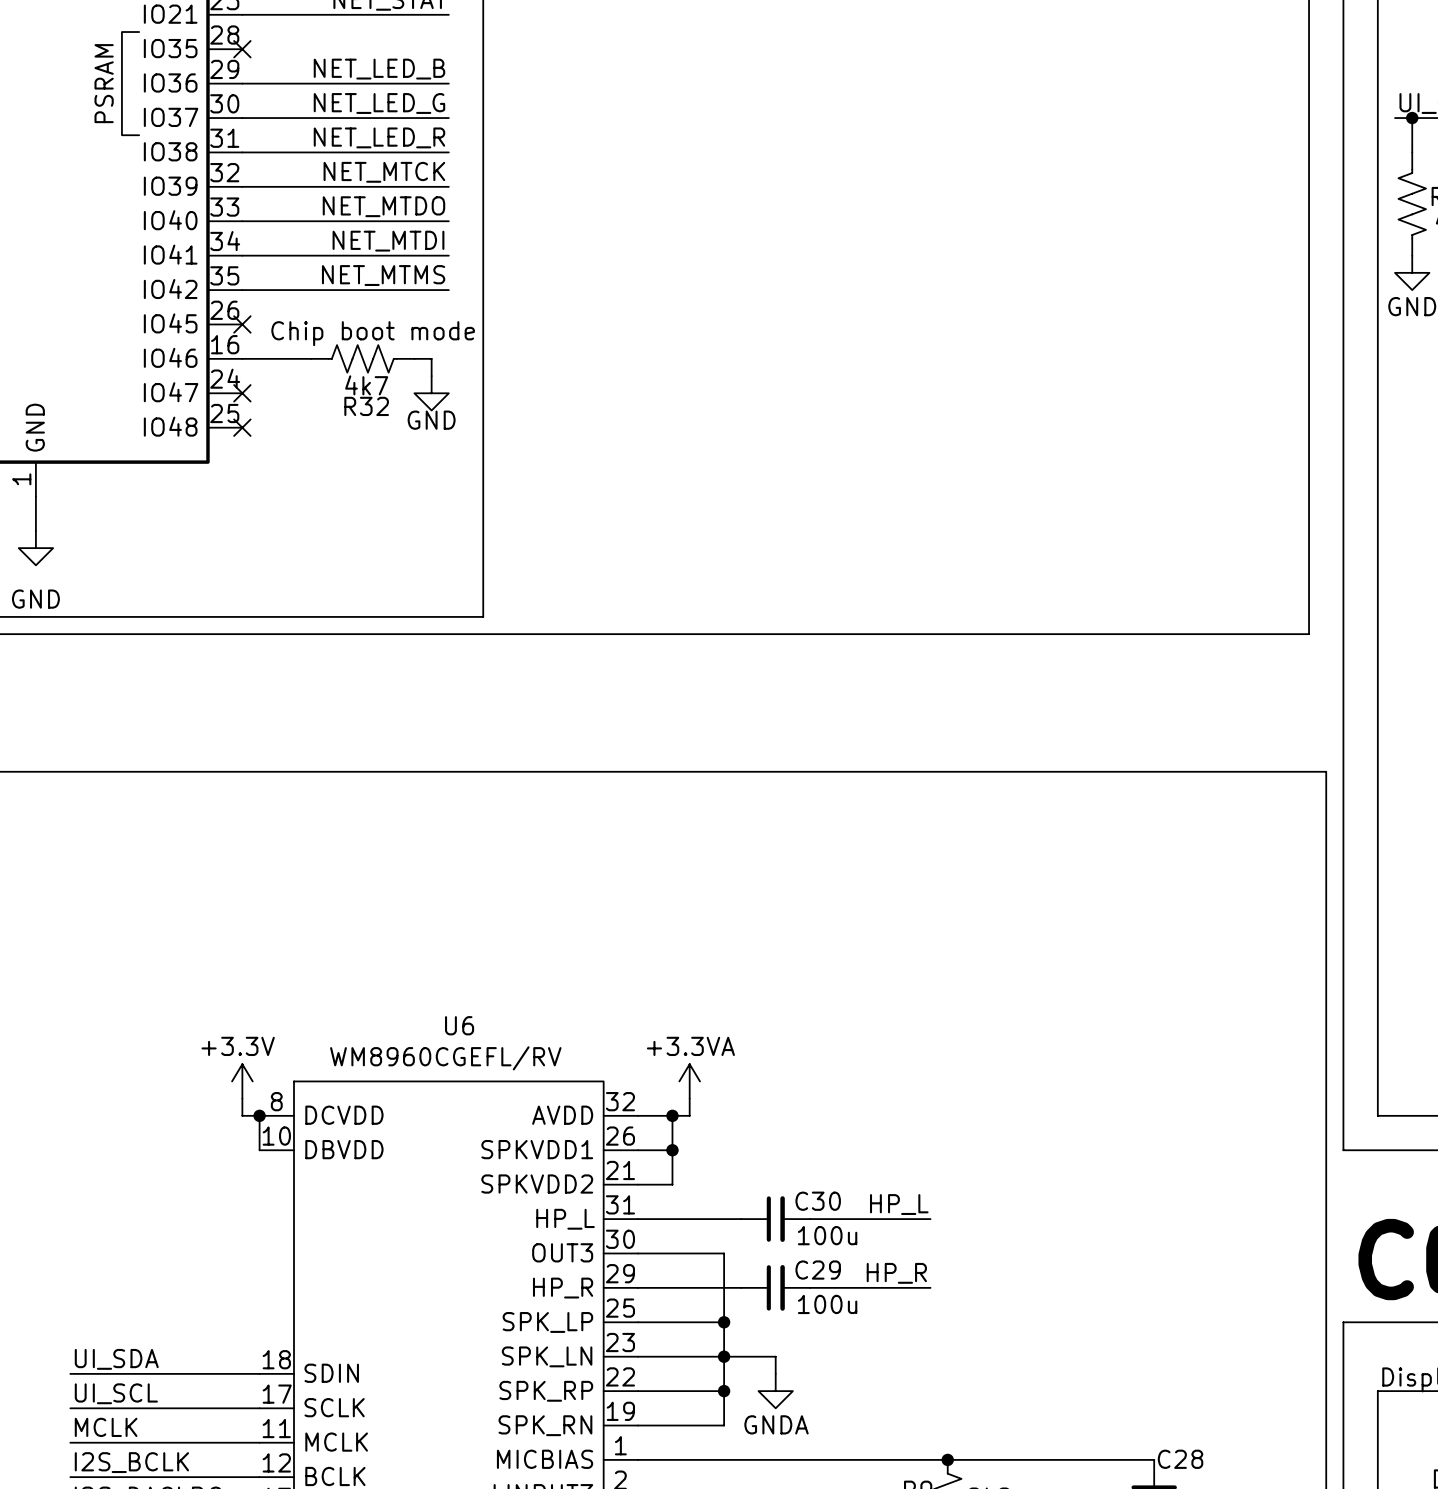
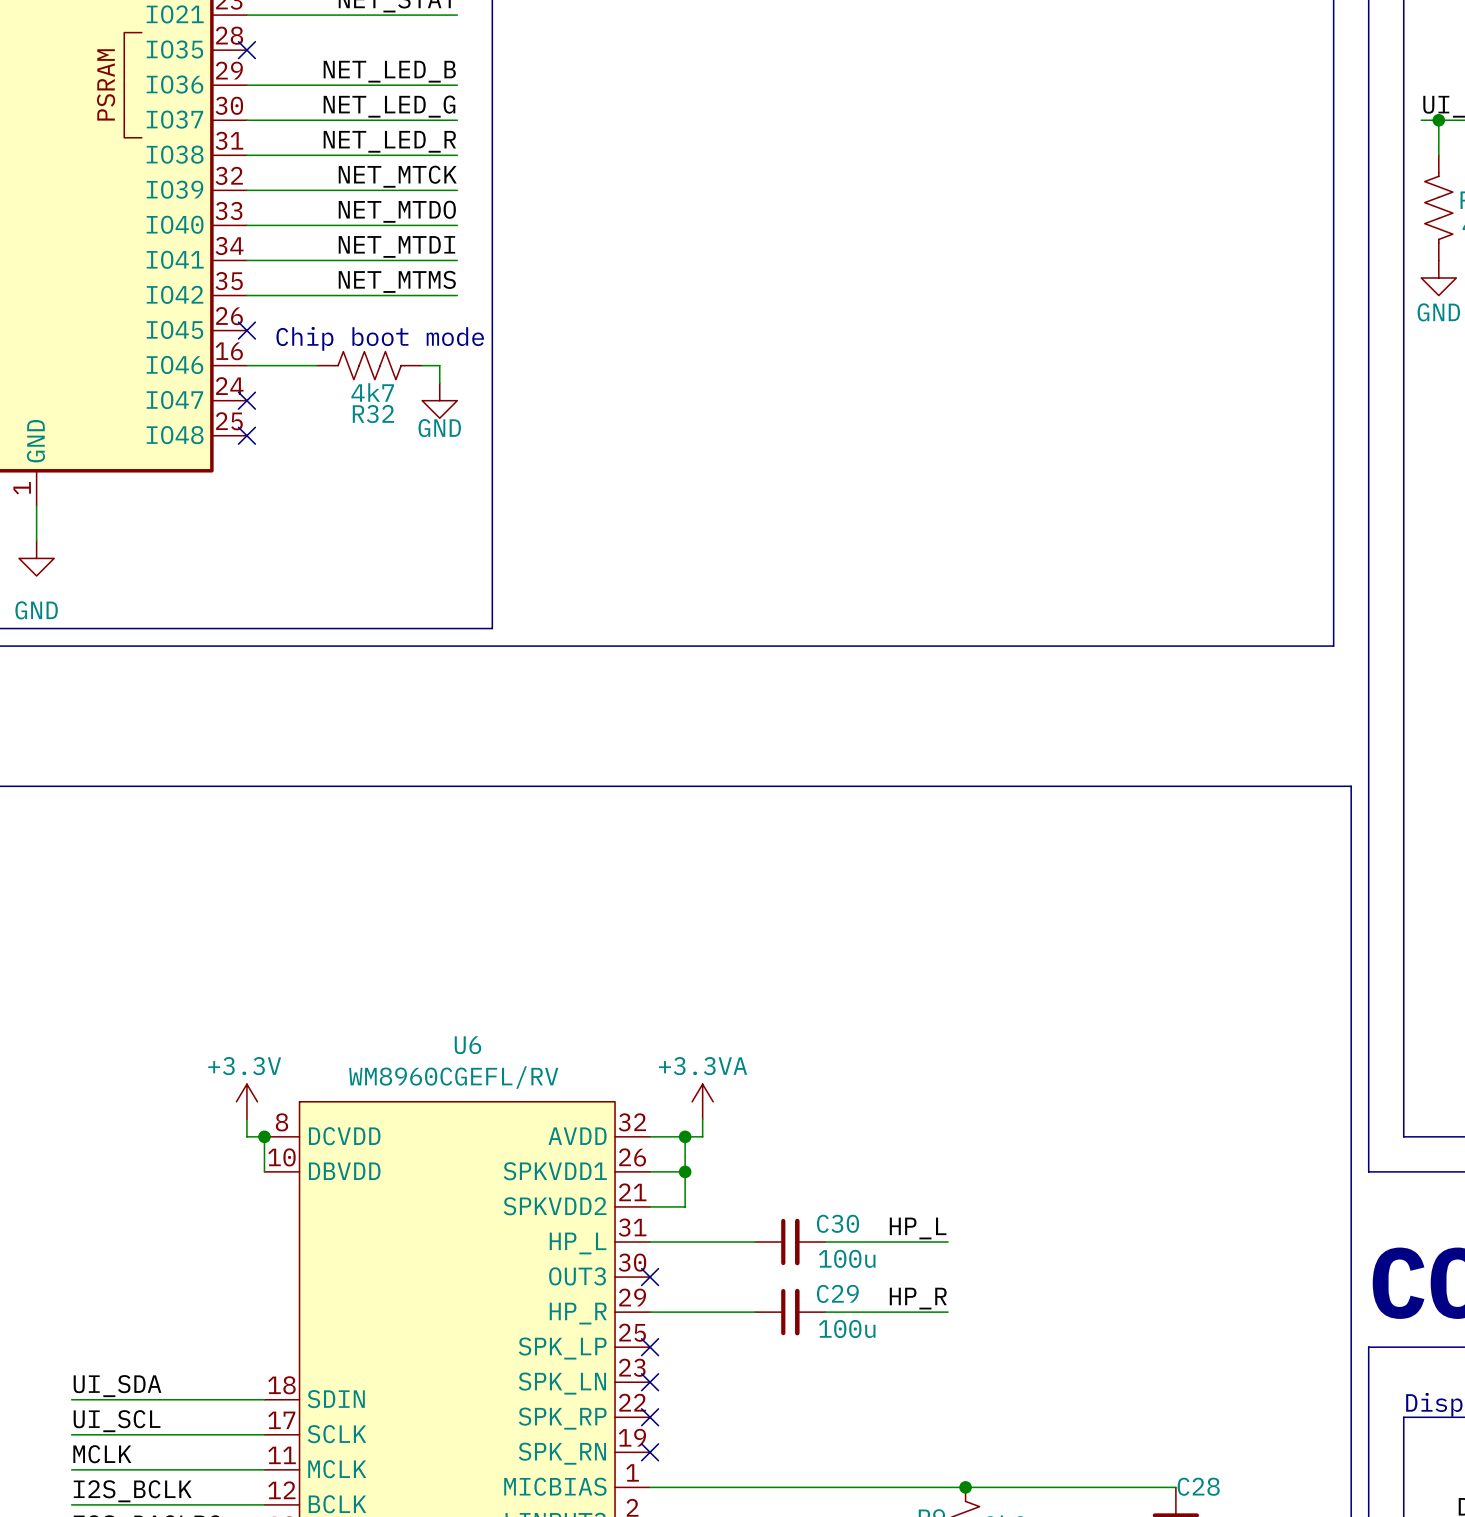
wire: (638, 1253) (724, 1253) (724, 1425) (638, 1425) -> none
no-connect mark: none -> (650, 1277)
wire: (638, 1322) (724, 1322) -> none
no-connect mark: none -> (650, 1347)
junction: (724, 1322) -> none
wire: (638, 1356) (775, 1356) (775, 1373) -> none
no-connect mark: none -> (650, 1382)
junction: (724, 1356) -> none
wire: (638, 1391) (724, 1391) -> none
no-connect mark: none -> (650, 1417)
junction: (724, 1391) -> none
power symbol: GNDA (775, 1391) -> none
no-connect mark: none -> (650, 1452)

